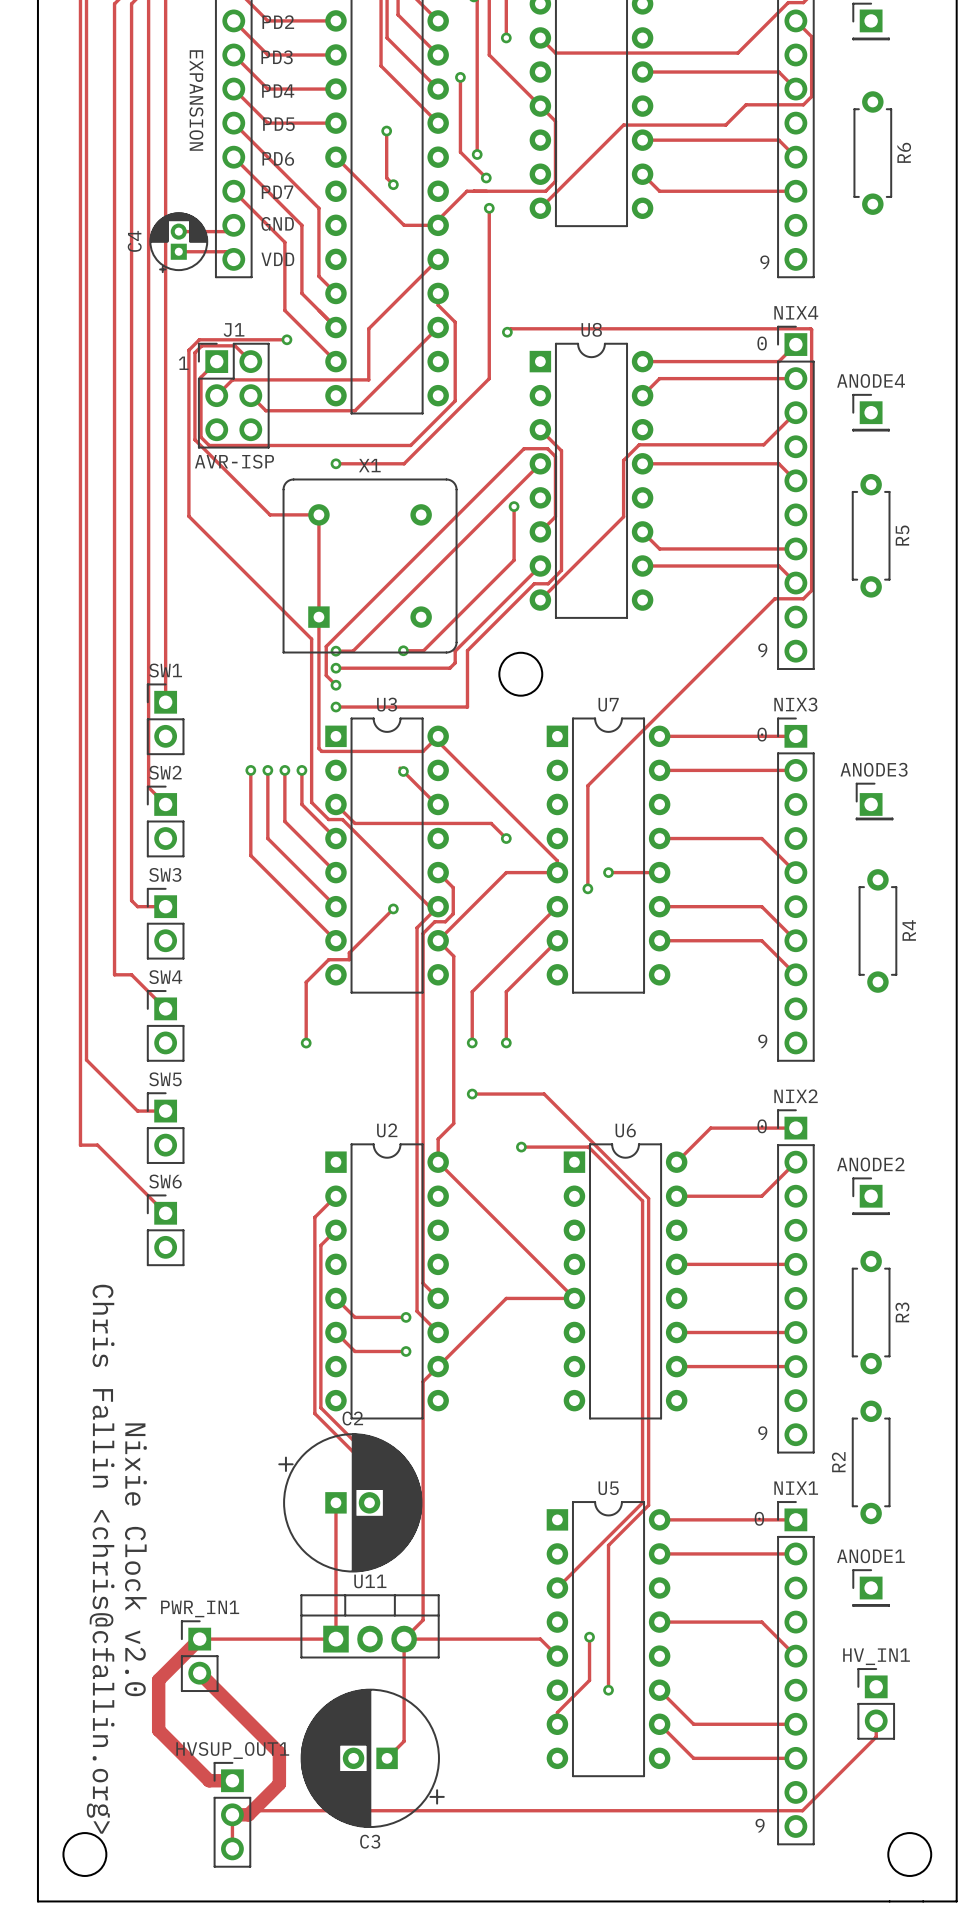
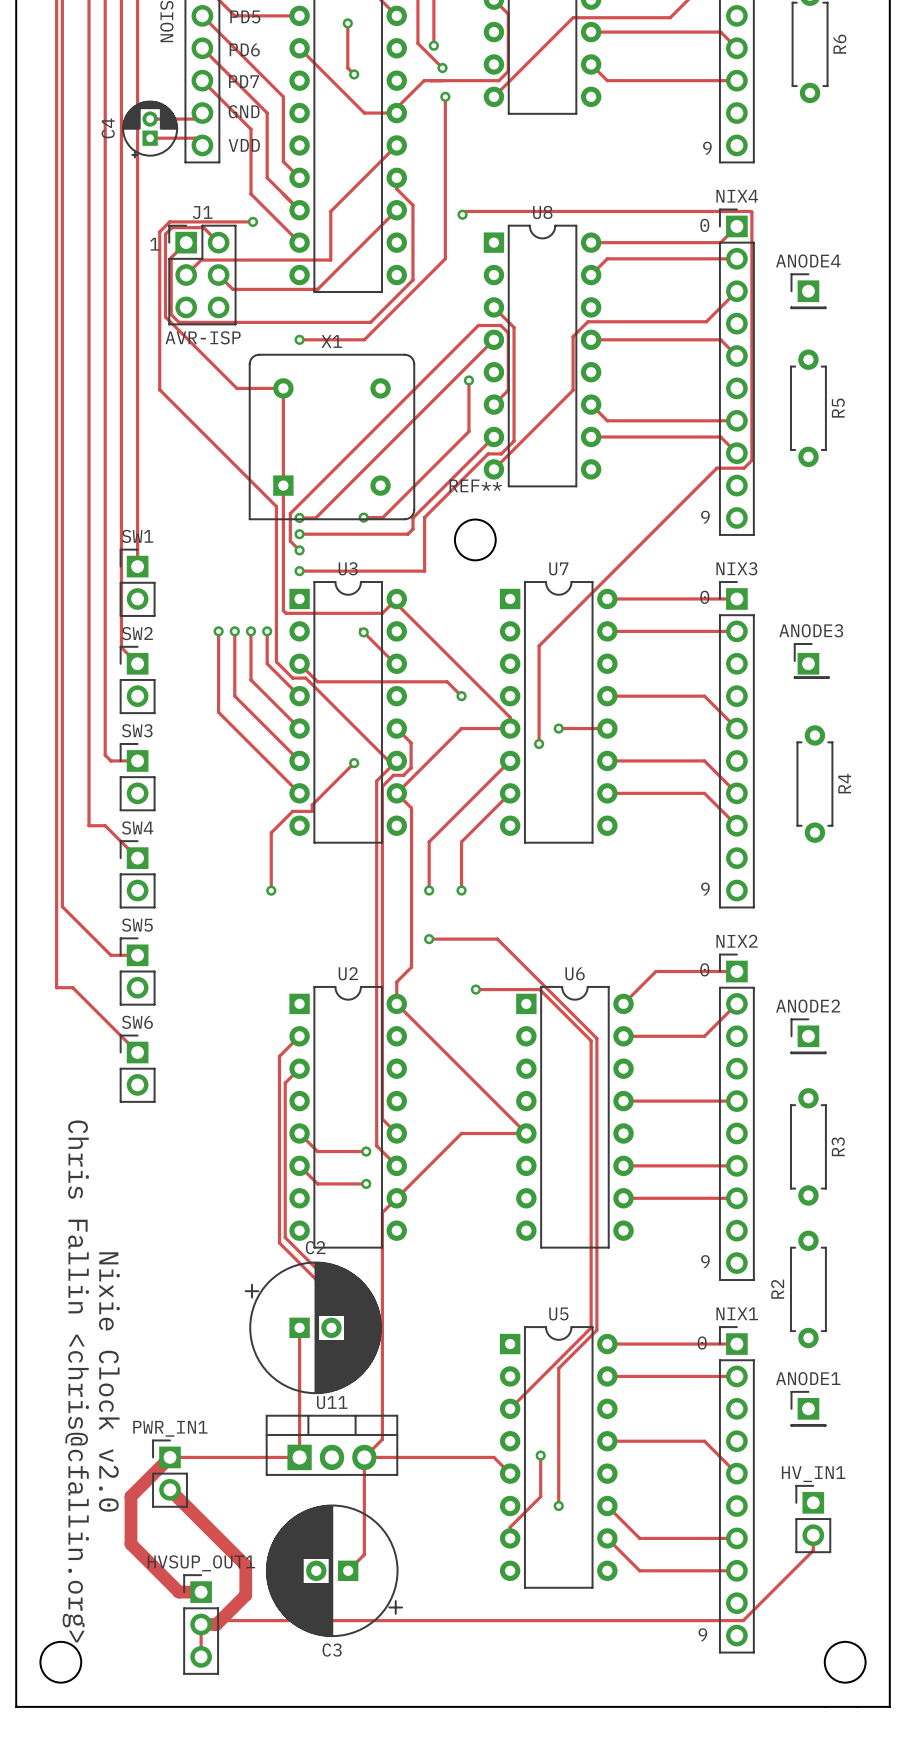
REF** name: none -> REF** (475, 485)

